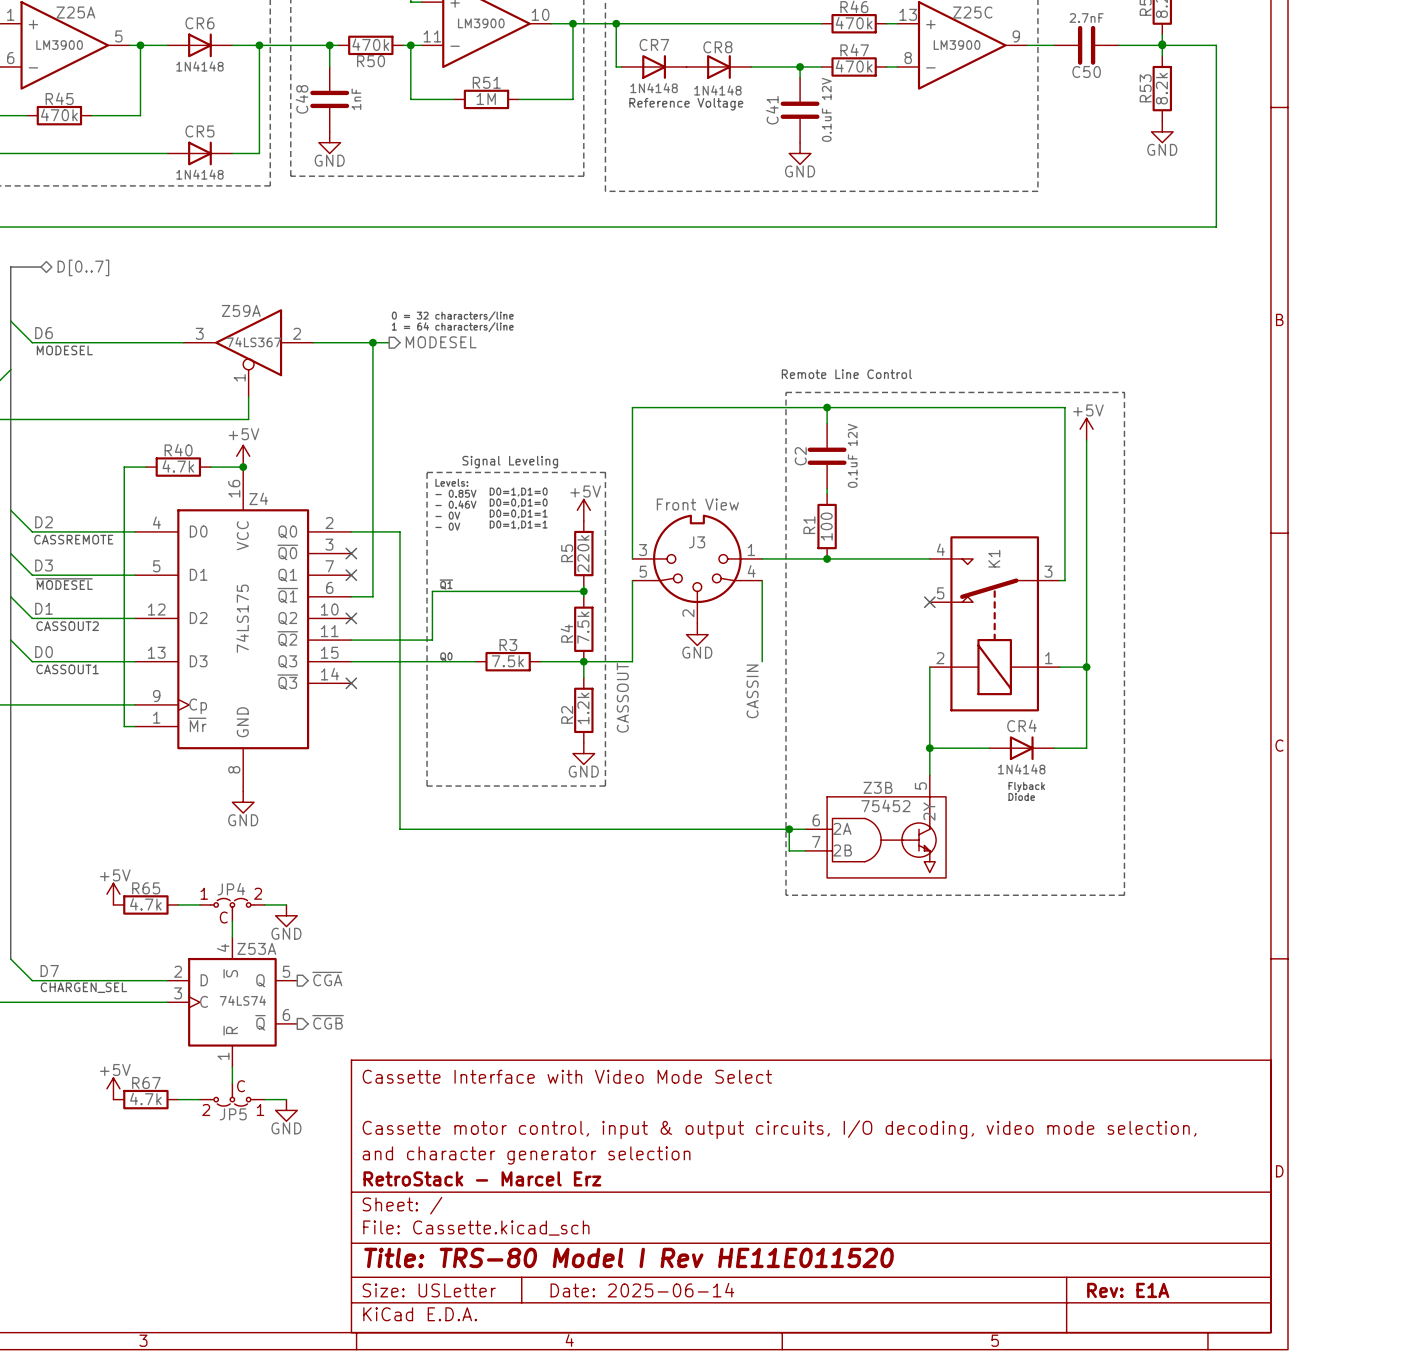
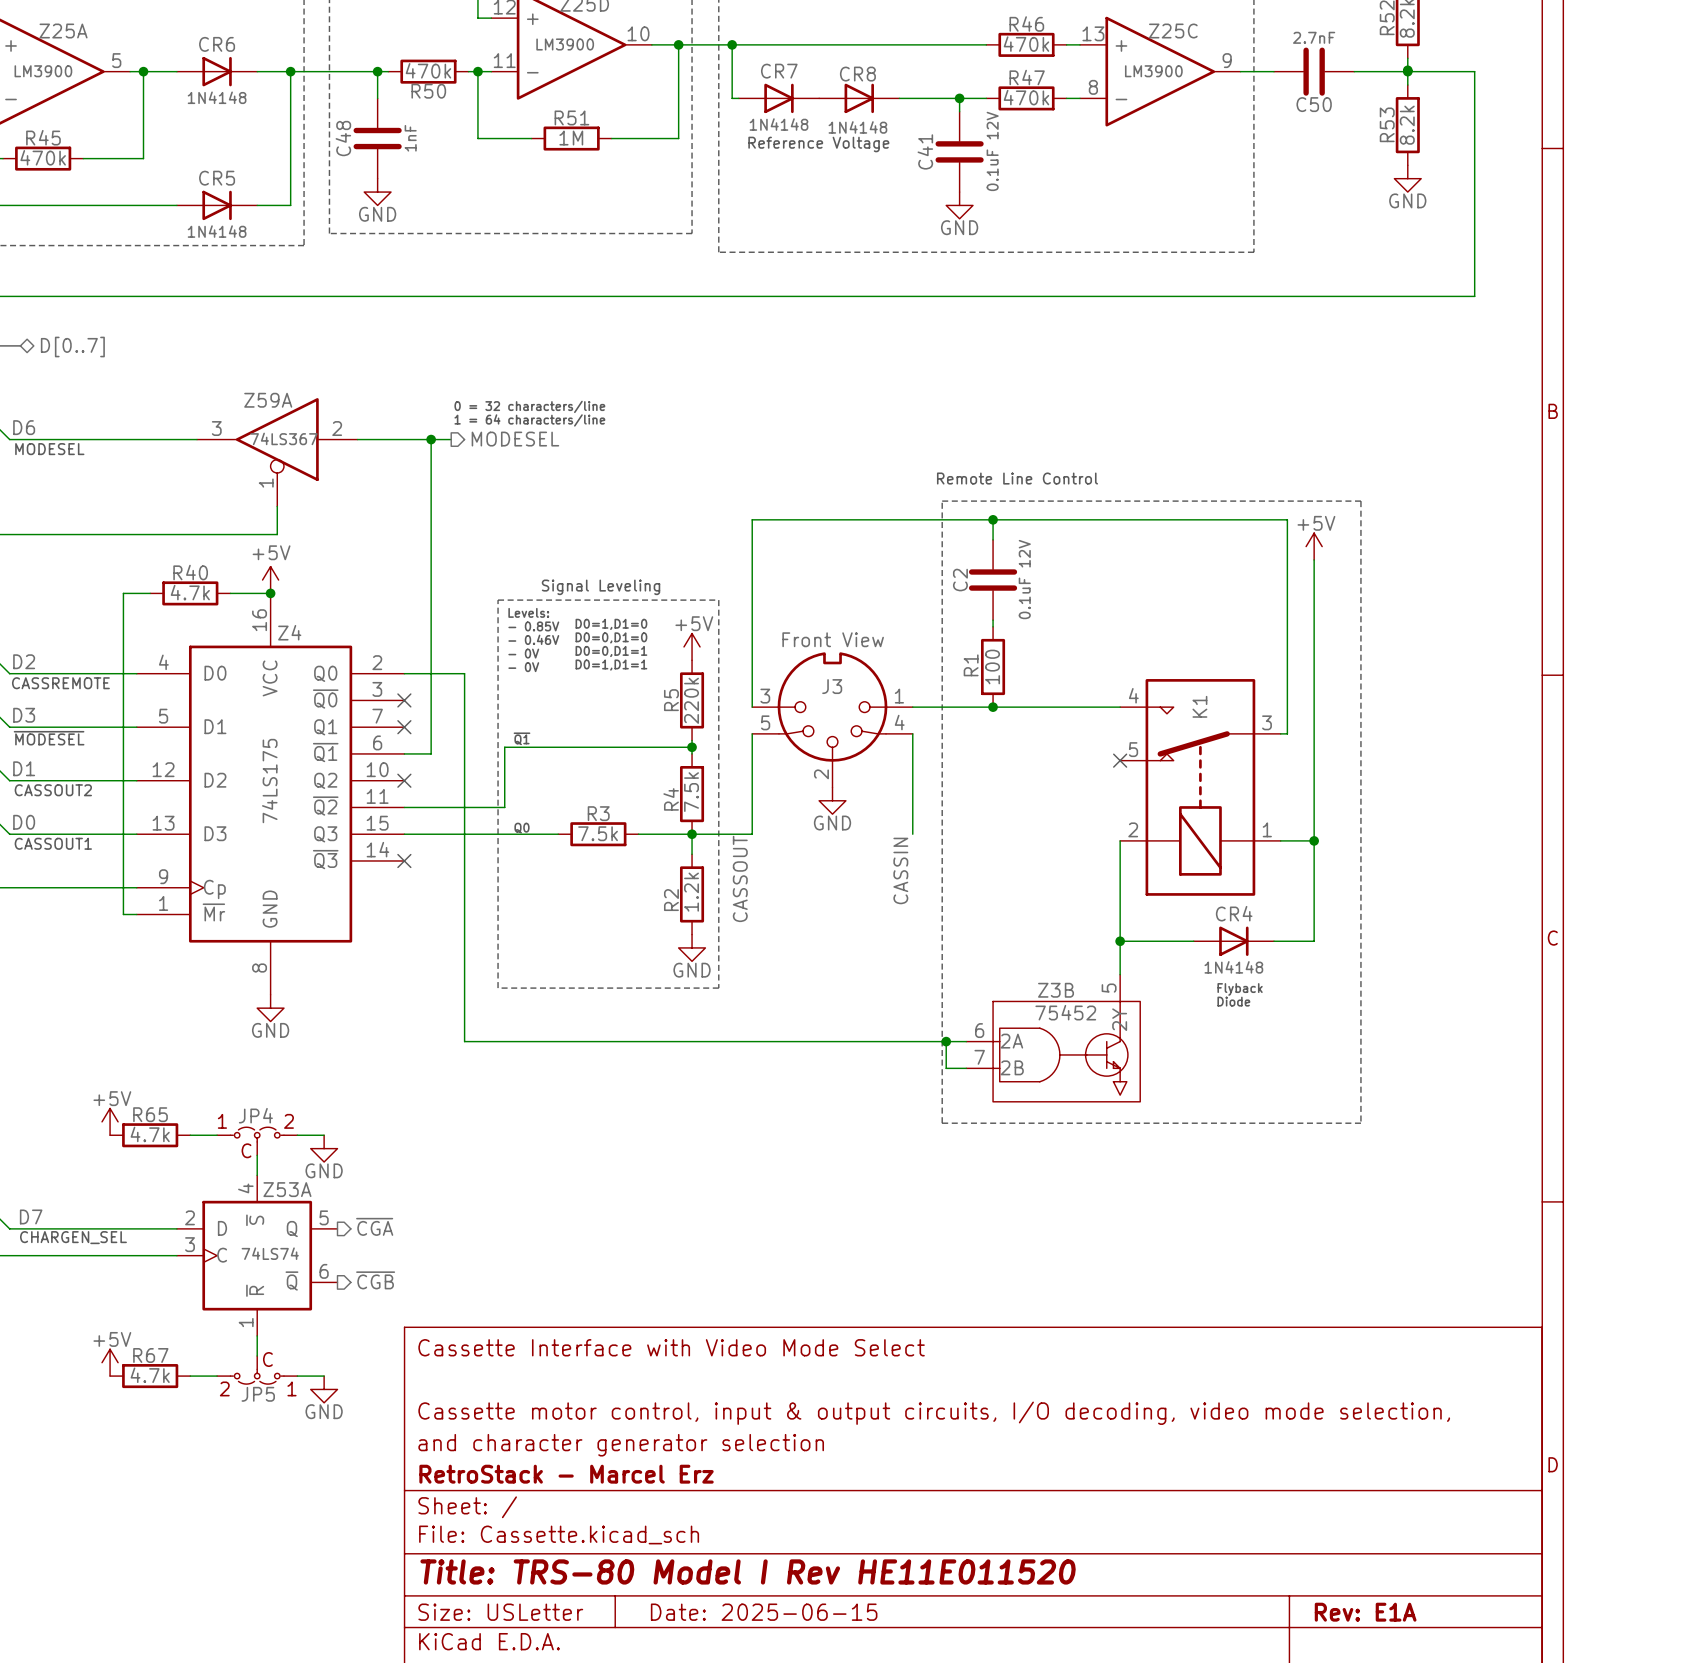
title block: Date: 2025-06-14 (642, 1290) -> Date: 2025-06-15 (764, 1612)

